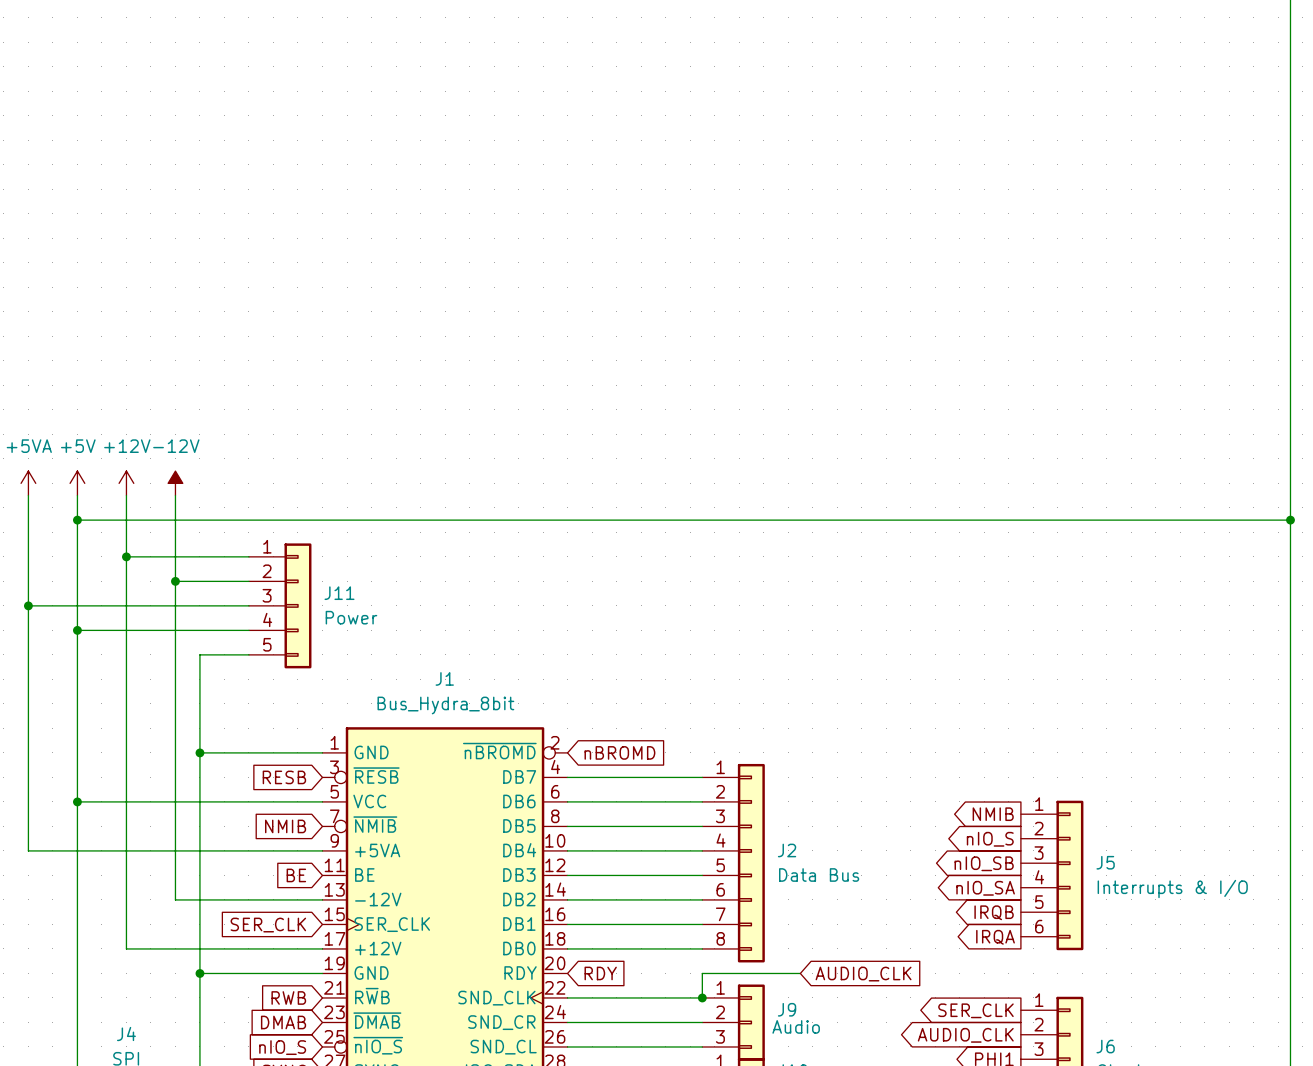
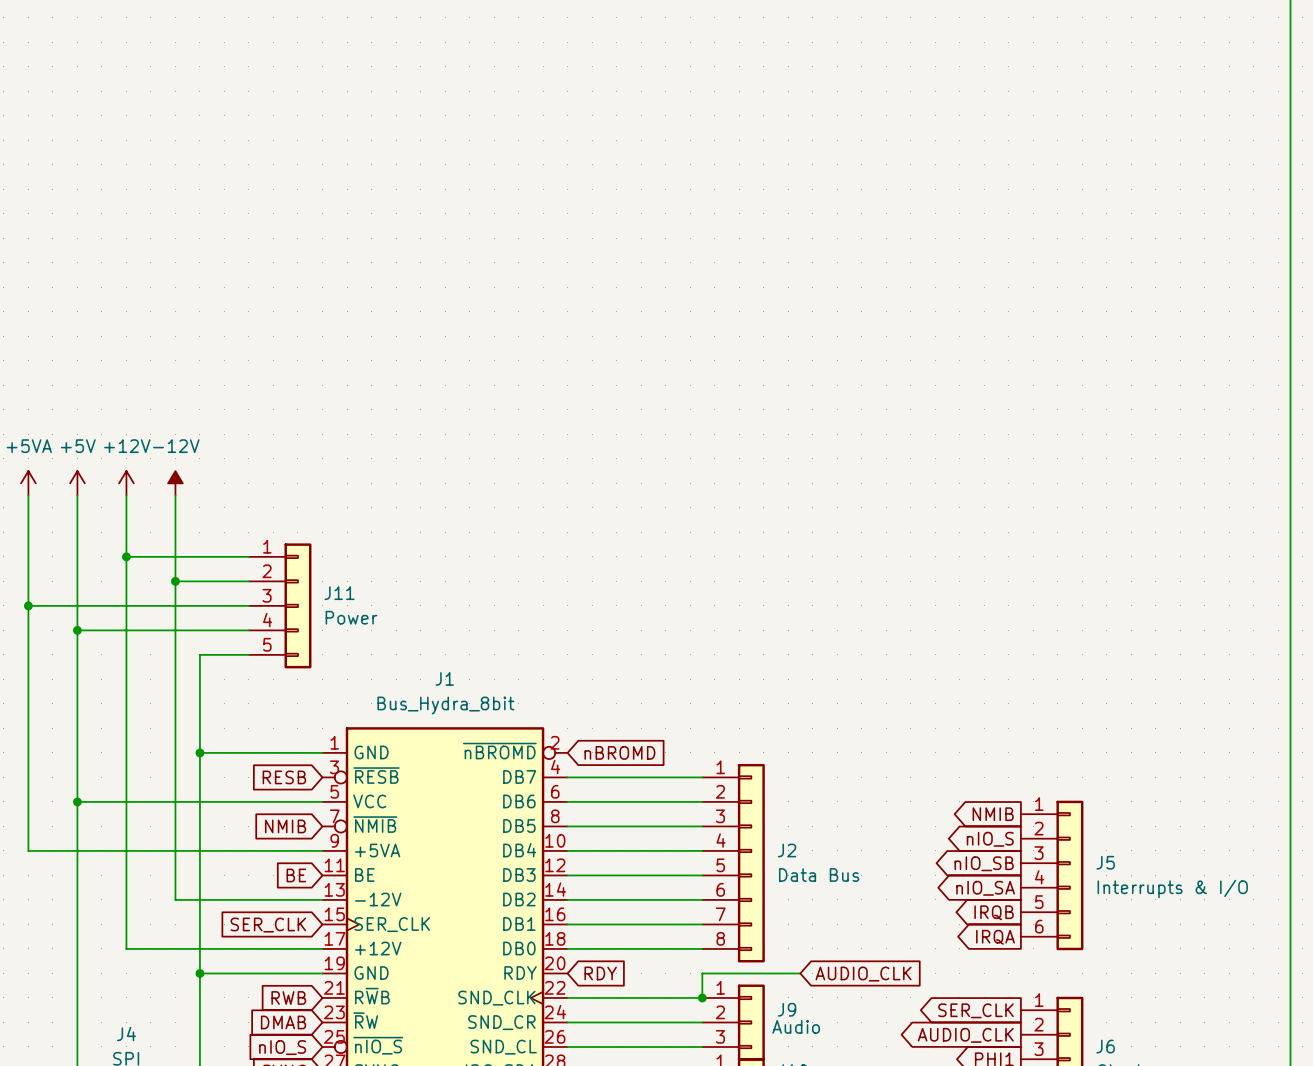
wire: (77, 520) (1290, 520) -> none
junction: (77, 520) -> none
junction: (1290, 520) -> none
J1 pin name: ~{DMAB} (377, 1020) -> ~{R}W (365, 1020)

